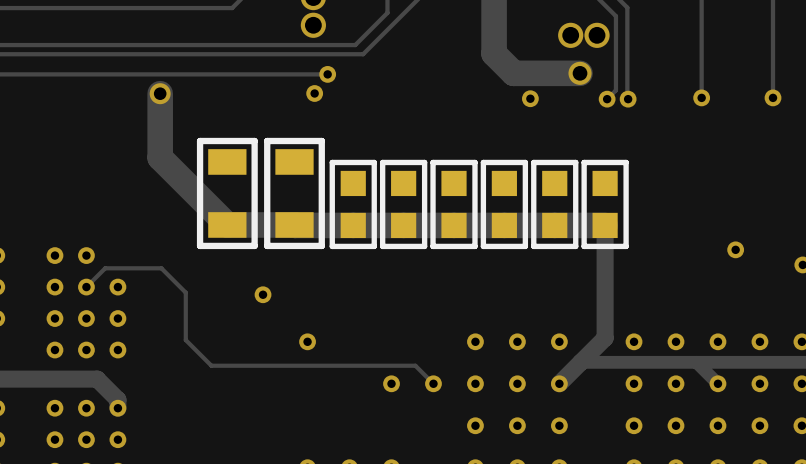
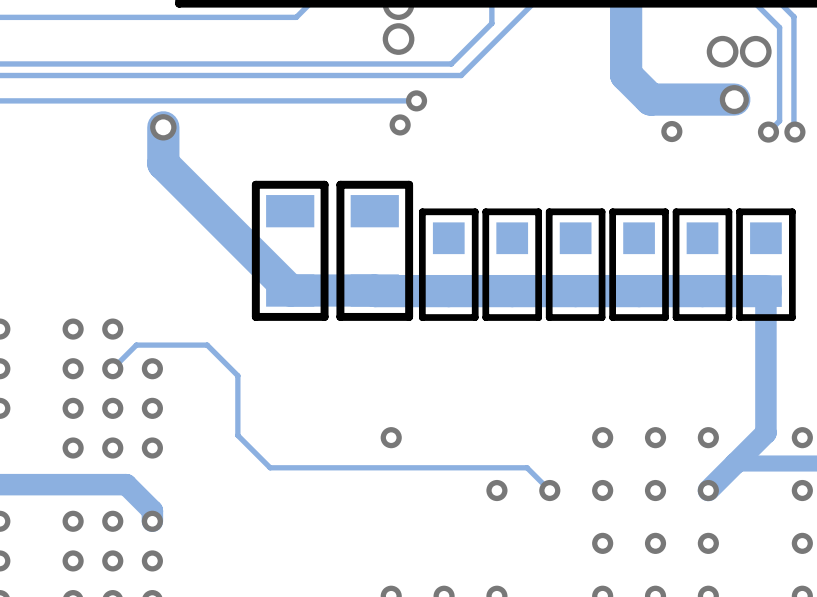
track: (160, 93) (160, 157) -> (163, 127) (163, 163) (205, 205)
via position: (160, 93) -> (163, 127)
via: (263, 294) -> none

